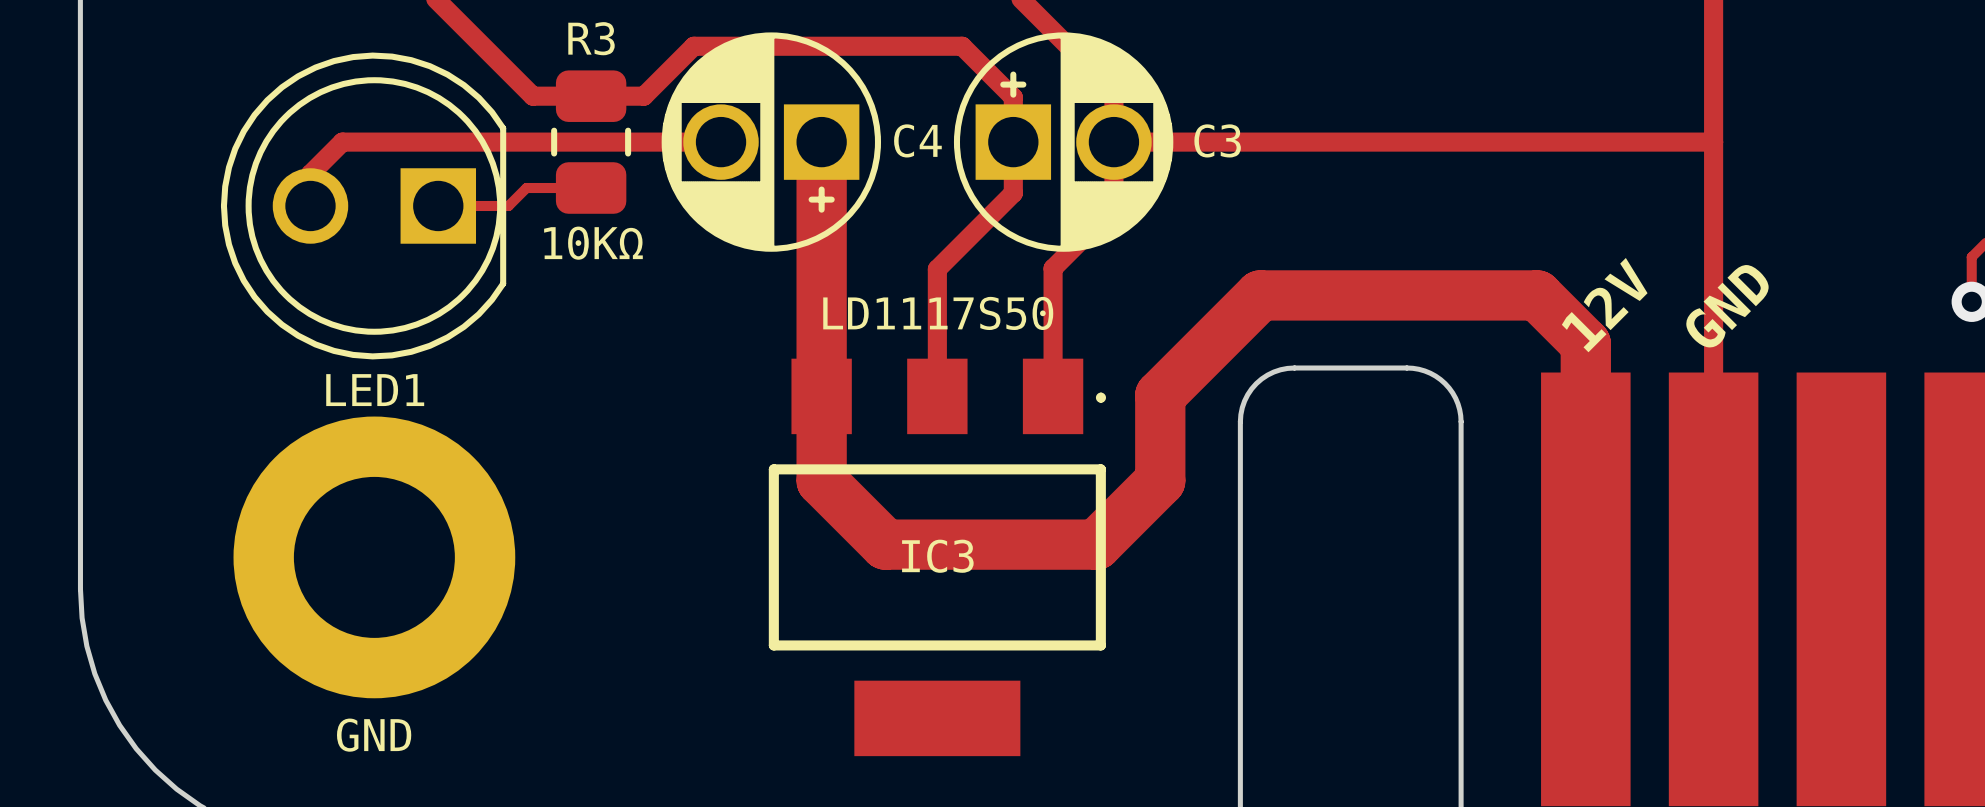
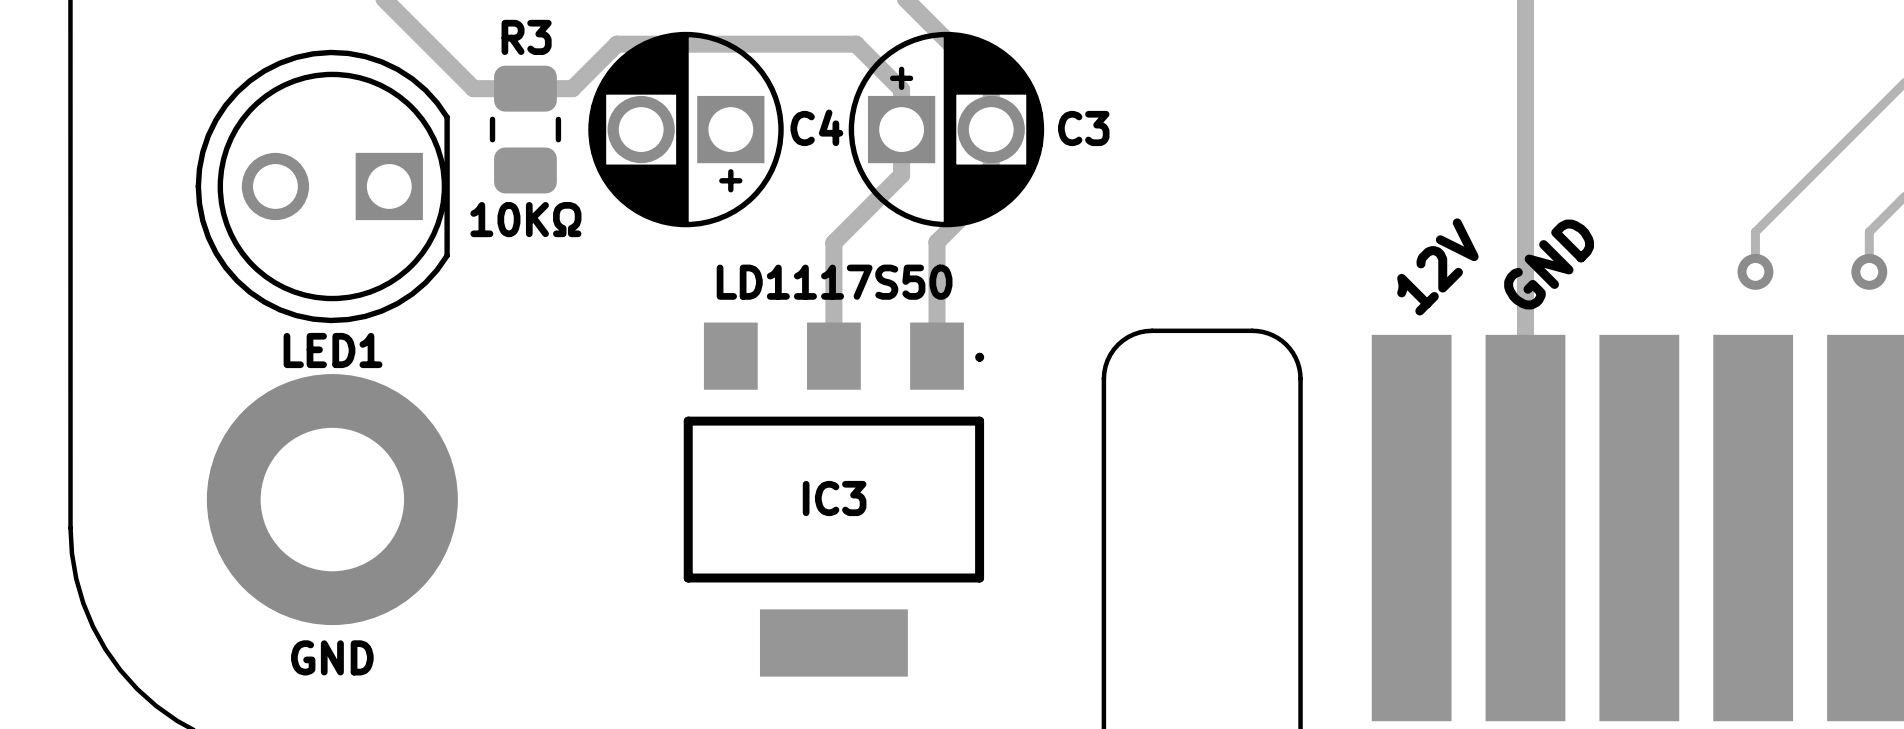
track: (721, 142) (342, 142) (310, 174) (310, 205) -> none
track: (821, 142) (821, 480) (885, 544) (1096, 544) (1160, 480) (1160, 395) (1260, 295) (1537, 295) (1585, 343) (1585, 589) -> none
track: (1113, 142) (1713, 142) -> none
track: (591, 188) (526, 188) (508, 205) (438, 205) -> none

